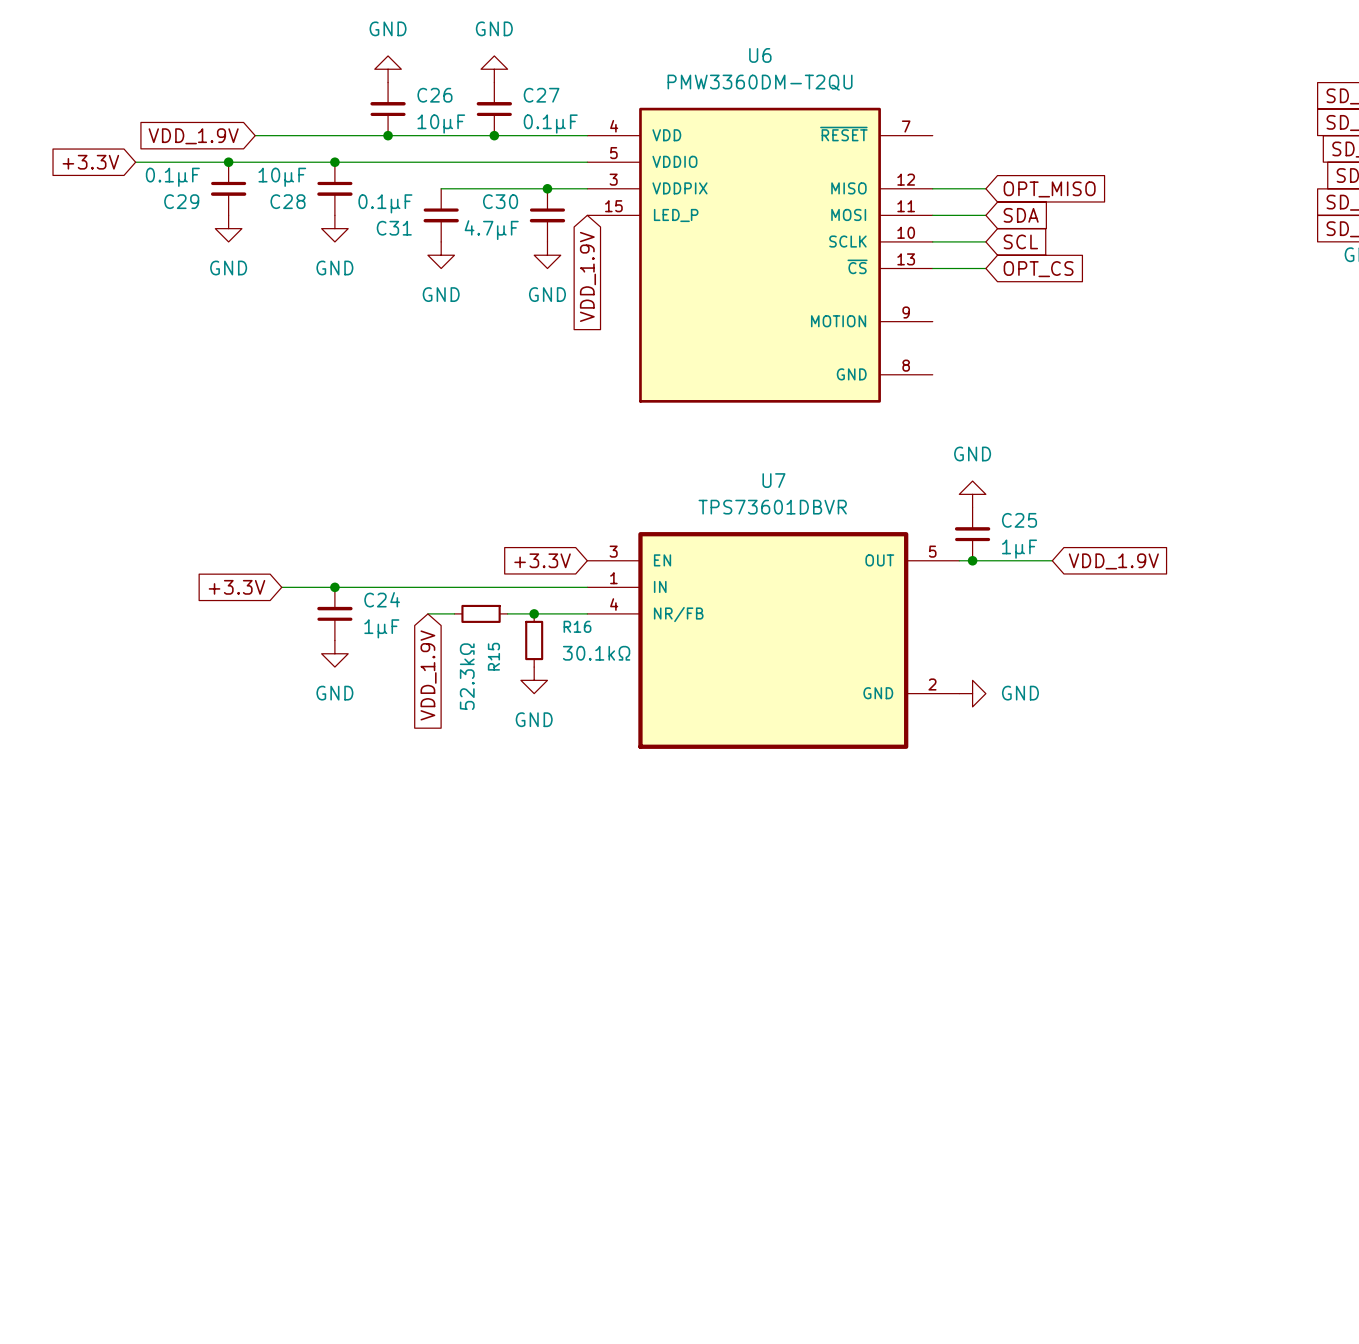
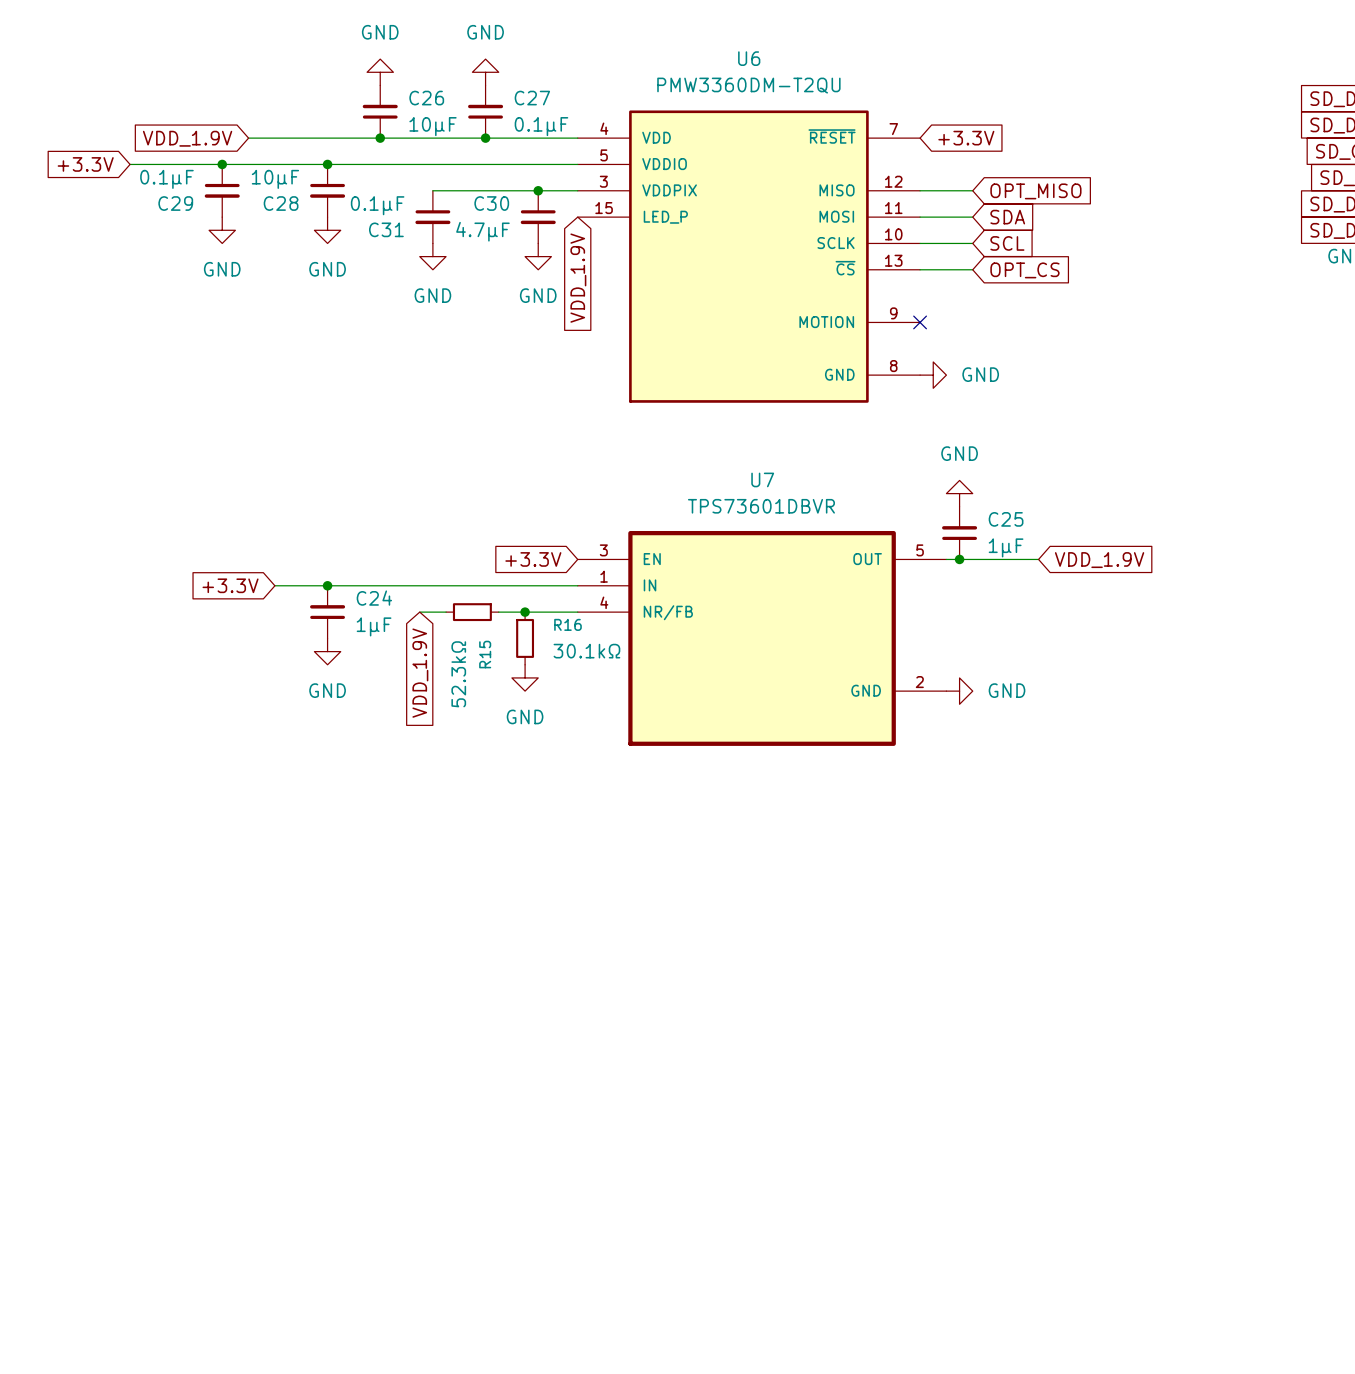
global label: none -> +3.3V (966, 138)
no-connect mark: none -> (920, 322)
power symbol: none -> GND (933, 375)

